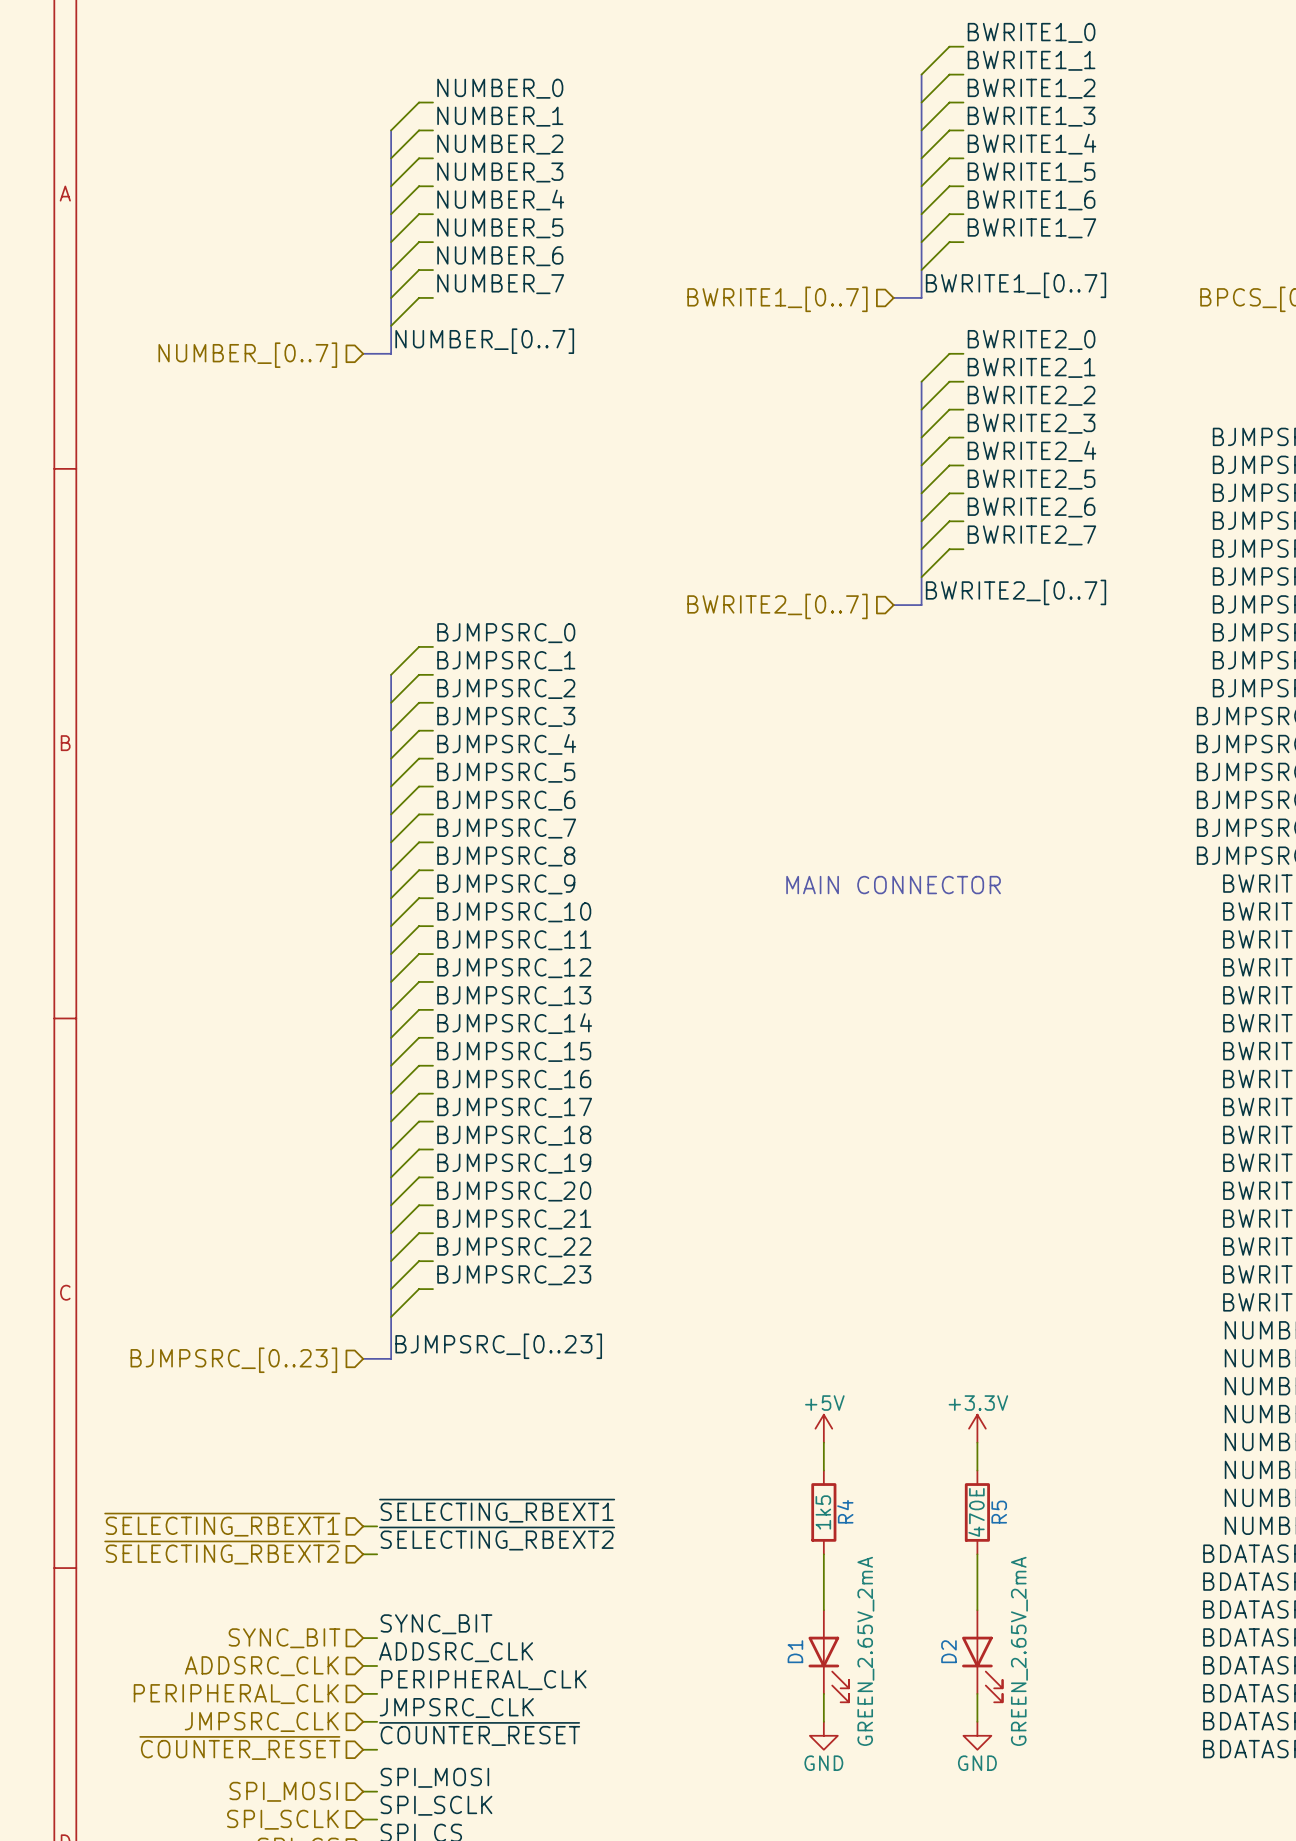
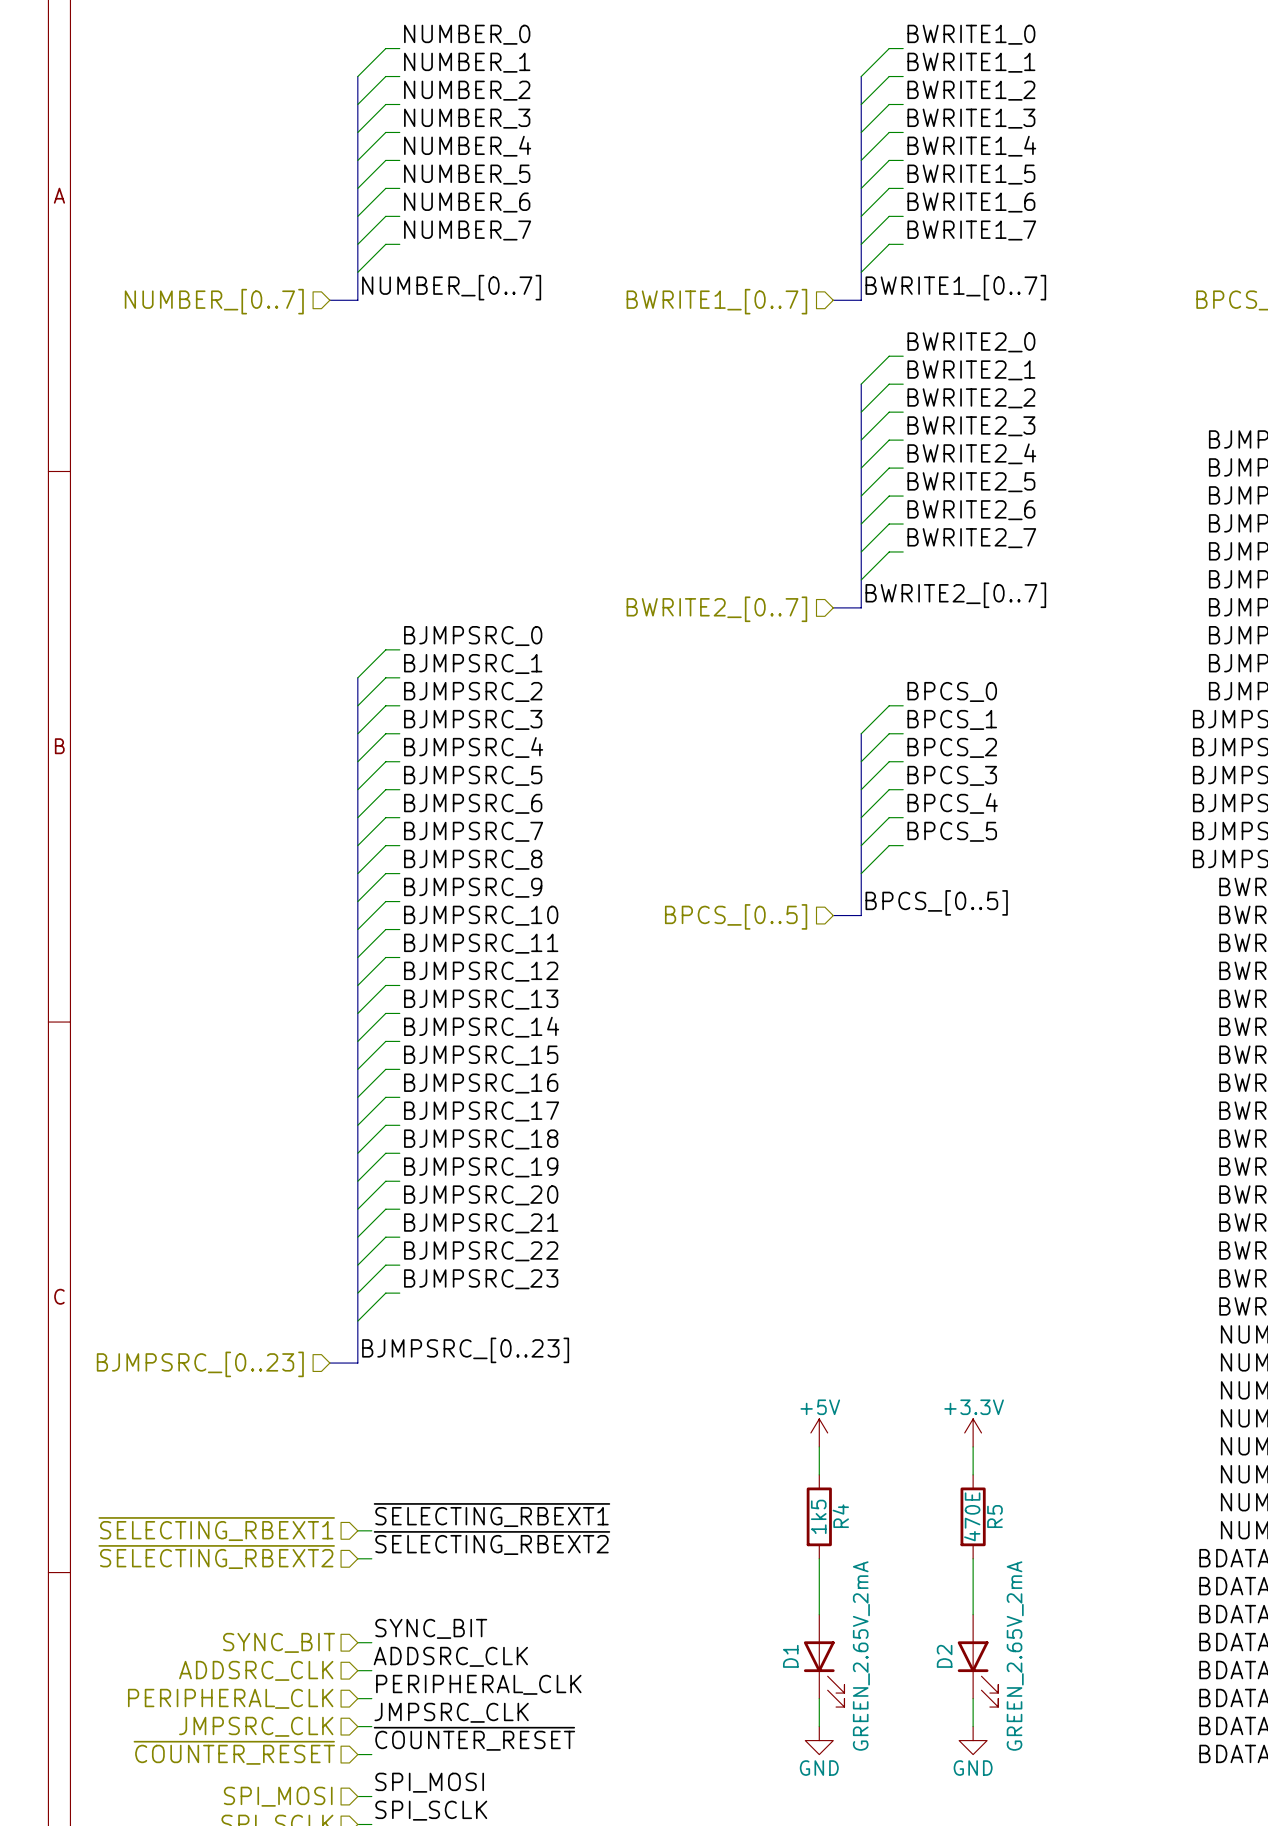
label position: BWRITE1_0 (1031, 32) -> BWRITE1_0 (971, 34)
wire: (963, 46) (949, 46) (921, 74) -> (903, 48) (889, 48) (861, 76)
label position: BWRITE1_1 (1031, 60) -> BWRITE1_1 (971, 62)
bus: (921, 74) (921, 297) (893, 297) -> (861, 76) (861, 300) (833, 300)
wire: (963, 74) (949, 74) (921, 102) -> (903, 76) (889, 76) (861, 104)
label position: NUMBER_0 (500, 88) -> NUMBER_0 (467, 34)
label position: BWRITE1_2 (1031, 88) -> BWRITE1_2 (971, 90)
wire: (432, 102) (419, 102) (391, 130) -> (399, 104) (385, 104) (357, 132)
wire: (963, 102) (949, 102) (921, 130) -> (903, 104) (889, 104) (861, 132)
label position: NUMBER_1 (500, 116) -> NUMBER_1 (467, 62)
label position: BWRITE1_3 (1031, 116) -> BWRITE1_3 (971, 118)
bus: (391, 130) (391, 353) (363, 353) -> (357, 76) (357, 300) (329, 300)
wire: (432, 130) (419, 130) (391, 158) -> (399, 132) (385, 132) (357, 160)
wire: (963, 130) (949, 130) (921, 158) -> (903, 132) (889, 132) (861, 160)
label position: NUMBER_2 (500, 144) -> NUMBER_2 (467, 90)
label position: BWRITE1_4 (1031, 144) -> BWRITE1_4 (971, 146)
wire: (432, 158) (419, 158) (391, 186) -> (399, 160) (385, 160) (357, 188)
wire: (963, 158) (949, 158) (921, 186) -> (903, 160) (889, 160) (861, 188)
label position: NUMBER_3 (500, 172) -> NUMBER_3 (467, 118)
label position: BWRITE1_5 (1031, 172) -> BWRITE1_5 (971, 174)
wire: (432, 186) (419, 186) (391, 214) -> (399, 188) (385, 188) (357, 216)
wire: (963, 186) (949, 186) (921, 214) -> (903, 188) (889, 188) (861, 216)
label position: NUMBER_4 (500, 199) -> NUMBER_4 (467, 146)
label position: BWRITE1_6 (1031, 200) -> BWRITE1_6 (971, 202)
wire: (432, 214) (419, 214) (391, 242) -> (399, 216) (385, 216) (357, 244)
wire: (963, 214) (949, 214) (921, 242) -> (903, 216) (889, 216) (861, 244)
label position: NUMBER_5 (500, 228) -> NUMBER_5 (467, 174)
label position: BWRITE1_7 (1031, 228) -> BWRITE1_7 (971, 230)
wire: (432, 242) (419, 242) (391, 270) -> (399, 244) (385, 244) (357, 272)
wire: (963, 242) (949, 242) (921, 270) -> (903, 244) (889, 244) (861, 272)
label position: NUMBER_6 (500, 256) -> NUMBER_6 (467, 202)
wire: (432, 270) (419, 270) (391, 297) -> (399, 76) (385, 76) (357, 104)
label position: NUMBER_7 (500, 284) -> NUMBER_7 (467, 230)
label position: BWRITE1_[0..7] (1016, 285) -> BWRITE1_[0..7] (955, 287)
wire: (432, 297) (419, 297) (391, 325) -> (399, 48) (385, 48) (357, 76)
hierarchical label position: BWRITE1_[0..7] (777, 299) -> BWRITE1_[0..7] (716, 301)
label position: BWRITE2_0 (1031, 339) -> BWRITE2_0 (971, 342)
label position: NUMBER_[0..7] (484, 341) -> NUMBER_[0..7] (451, 287)
wire: (963, 353) (949, 353) (921, 381) -> (903, 356) (889, 356) (861, 384)
hierarchical label position: NUMBER_[0..7] (247, 355) -> NUMBER_[0..7] (214, 301)
label position: BWRITE2_1 (1031, 367) -> BWRITE2_1 (971, 370)
bus: (921, 381) (921, 605) (893, 605) -> (861, 384) (861, 607) (833, 607)
wire: (963, 381) (949, 381) (921, 409) -> (903, 384) (889, 384) (861, 412)
label position: BWRITE2_2 (1031, 395) -> BWRITE2_2 (971, 398)
wire: (963, 409) (949, 409) (921, 437) -> (903, 412) (889, 412) (861, 440)
label position: BWRITE2_3 (1031, 423) -> BWRITE2_3 (971, 426)
wire: (963, 437) (949, 437) (921, 465) -> (903, 440) (889, 440) (861, 468)
label position: BWRITE2_4 (1031, 451) -> BWRITE2_4 (971, 453)
wire: (963, 465) (949, 465) (921, 493) -> (903, 468) (889, 468) (861, 496)
label position: BWRITE2_5 (1031, 479) -> BWRITE2_5 (971, 482)
wire: (963, 493) (949, 493) (921, 521) -> (903, 496) (889, 496) (861, 524)
label position: BWRITE2_6 (1031, 507) -> BWRITE2_6 (971, 510)
wire: (963, 521) (949, 521) (921, 549) -> (903, 524) (889, 524) (861, 551)
label position: BWRITE2_7 (1031, 535) -> BWRITE2_7 (971, 538)
wire: (963, 549) (949, 549) (921, 577) -> (903, 551) (889, 551) (861, 579)
label position: BWRITE2_[0..7] (1016, 592) -> BWRITE2_[0..7] (955, 595)
hierarchical label position: BWRITE2_[0..7] (777, 606) -> BWRITE2_[0..7] (716, 609)
label position: BJMPSRC_0 (506, 633) -> BJMPSRC_0 (473, 636)
wire: (432, 646) (419, 646) (391, 674) -> (399, 649) (385, 649) (357, 677)
label position: BJMPSRC_1 (506, 661) -> BJMPSRC_1 (473, 663)
bus: (391, 674) (391, 1358) (363, 1358) -> (357, 677) (357, 1363) (329, 1363)
wire: (432, 674) (419, 674) (391, 702) -> (399, 677) (385, 677) (357, 705)
label position: BJMPSRC_2 (506, 688) -> BJMPSRC_2 (473, 691)
label: none -> BPCS_0 (952, 691)
wire: (432, 702) (419, 702) (391, 730) -> (399, 705) (385, 705) (357, 733)
wire: none -> (903, 705) (889, 705) (861, 733)
label position: BJMPSRC_3 (506, 716) -> BJMPSRC_3 (473, 719)
label: none -> BPCS_1 (952, 719)
wire: (432, 730) (419, 730) (391, 758) -> (399, 733) (385, 733) (357, 761)
bus: none -> (861, 733) (861, 915) (833, 915)
wire: none -> (903, 733) (889, 733) (861, 761)
label position: BJMPSRC_4 (506, 744) -> BJMPSRC_4 (473, 747)
label: none -> BPCS_2 (952, 747)
wire: (432, 758) (419, 758) (391, 786) -> (399, 761) (385, 761) (357, 789)
wire: none -> (903, 761) (889, 761) (861, 789)
label position: BJMPSRC_5 (506, 772) -> BJMPSRC_5 (473, 775)
label: none -> BPCS_3 (952, 775)
wire: (432, 786) (419, 786) (391, 814) -> (399, 789) (385, 789) (357, 817)
wire: none -> (903, 789) (889, 789) (861, 817)
label position: BJMPSRC_6 (506, 800) -> BJMPSRC_6 (473, 803)
label: none -> BPCS_4 (952, 803)
wire: (432, 814) (419, 814) (391, 842) -> (399, 817) (385, 817) (357, 845)
wire: none -> (903, 817) (889, 817) (861, 845)
label position: BJMPSRC_7 (506, 828) -> BJMPSRC_7 (473, 831)
label: none -> BPCS_5 (952, 831)
wire: (432, 842) (419, 842) (391, 870) -> (399, 845) (385, 845) (357, 873)
wire: none -> (903, 845) (889, 845) (861, 873)
label position: BJMPSRC_8 (506, 856) -> BJMPSRC_8 (473, 859)
wire: (432, 870) (419, 870) (391, 898) -> (399, 873) (385, 873) (357, 901)
label position: BJMPSRC_9 (506, 884) -> BJMPSRC_9 (473, 887)
text: MAIN CONNECTOR (893, 885) -> none
wire: (432, 898) (419, 898) (391, 926) -> (399, 901) (385, 901) (357, 929)
label: none -> BPCS_[0..5] (936, 902)
label position: BJMPSRC_10 (514, 912) -> BJMPSRC_10 (481, 915)
hierarchical label: none -> BPCS_[0..5] (736, 916)
wire: (432, 926) (419, 926) (391, 954) -> (399, 929) (385, 929) (357, 957)
label position: BJMPSRC_11 (514, 940) -> BJMPSRC_11 (481, 943)
wire: (432, 954) (419, 954) (391, 981) -> (399, 957) (385, 957) (357, 985)
label position: BJMPSRC_12 (514, 968) -> BJMPSRC_12 (481, 971)
wire: (432, 981) (419, 981) (391, 1009) -> (399, 985) (385, 985) (357, 1013)
label position: BJMPSRC_13 (514, 996) -> BJMPSRC_13 (481, 999)
wire: (432, 1009) (419, 1009) (391, 1037) -> (399, 1013) (385, 1013) (357, 1041)
label position: BJMPSRC_14 (514, 1023) -> BJMPSRC_14 (481, 1027)
wire: (432, 1037) (419, 1037) (391, 1065) -> (399, 1041) (385, 1041) (357, 1069)
label position: BJMPSRC_15 (514, 1051) -> BJMPSRC_15 (481, 1055)
wire: (432, 1065) (419, 1065) (391, 1093) -> (399, 1069) (385, 1069) (357, 1097)
label position: BJMPSRC_16 (514, 1079) -> BJMPSRC_16 (481, 1083)
wire: (432, 1093) (419, 1093) (391, 1121) -> (399, 1097) (385, 1097) (357, 1125)
label position: BJMPSRC_17 (514, 1107) -> BJMPSRC_17 (481, 1111)
wire: (432, 1121) (419, 1121) (391, 1149) -> (399, 1125) (385, 1125) (357, 1153)
label position: BJMPSRC_18 (514, 1135) -> BJMPSRC_18 (481, 1139)
wire: (432, 1149) (419, 1149) (391, 1177) -> (399, 1153) (385, 1153) (357, 1181)
label position: BJMPSRC_19 (514, 1163) -> BJMPSRC_19 (481, 1167)
wire: (432, 1177) (419, 1177) (391, 1205) -> (399, 1181) (385, 1181) (357, 1209)
label position: BJMPSRC_20 (514, 1191) -> BJMPSRC_20 (481, 1195)
wire: (432, 1205) (419, 1205) (391, 1233) -> (399, 1209) (385, 1209) (357, 1237)
label position: BJMPSRC_21 (514, 1219) -> BJMPSRC_21 (481, 1223)
wire: (432, 1233) (419, 1233) (391, 1261) -> (399, 1237) (385, 1237) (357, 1265)
label position: BJMPSRC_22 (514, 1247) -> BJMPSRC_22 (481, 1251)
wire: (432, 1261) (419, 1261) (391, 1289) -> (399, 1265) (385, 1265) (357, 1293)
label position: BJMPSRC_23 (514, 1275) -> BJMPSRC_23 (481, 1279)
wire: (432, 1289) (419, 1289) (391, 1317) -> (399, 1293) (385, 1293) (357, 1321)
label position: BJMPSRC_[0..23] (498, 1346) -> BJMPSRC_[0..23] (465, 1350)
hierarchical label position: BJMPSRC_[0..23] (233, 1360) -> BJMPSRC_[0..23] (200, 1364)

